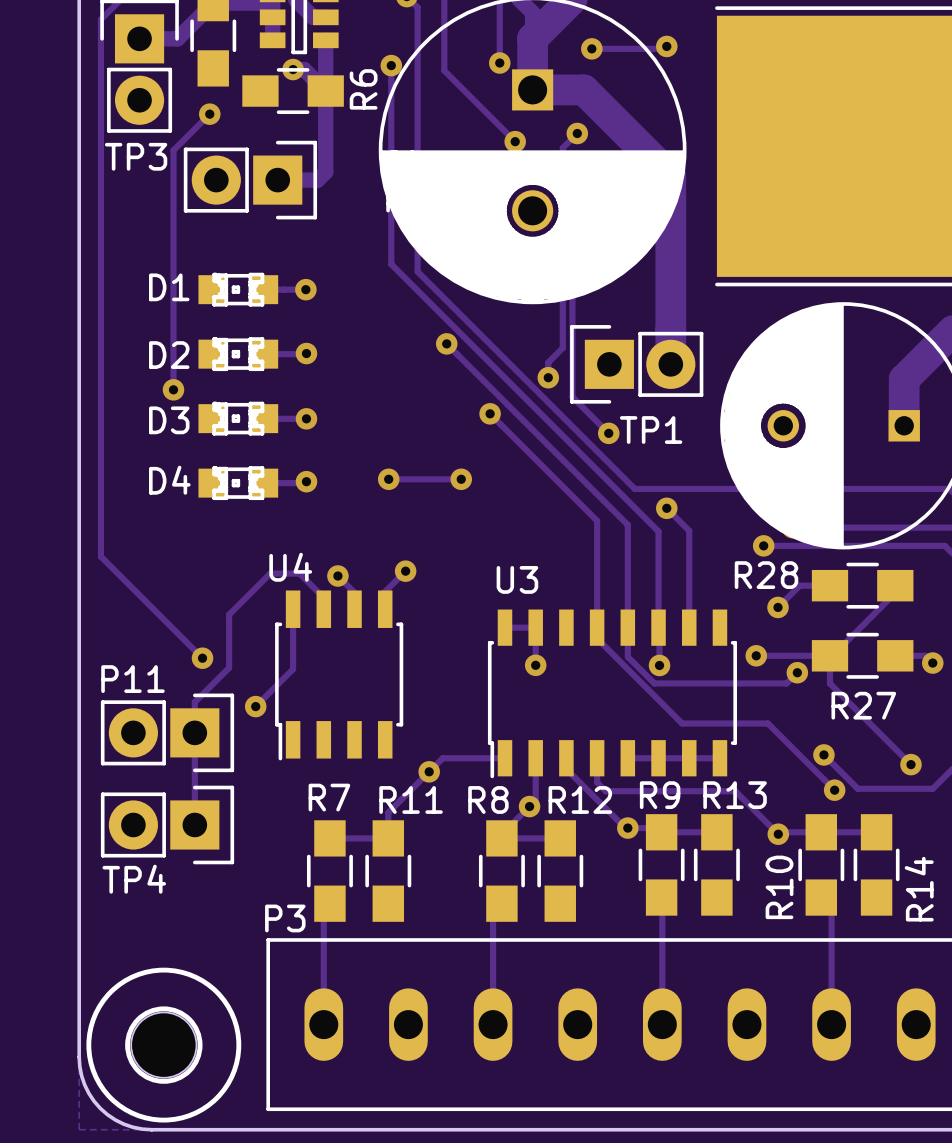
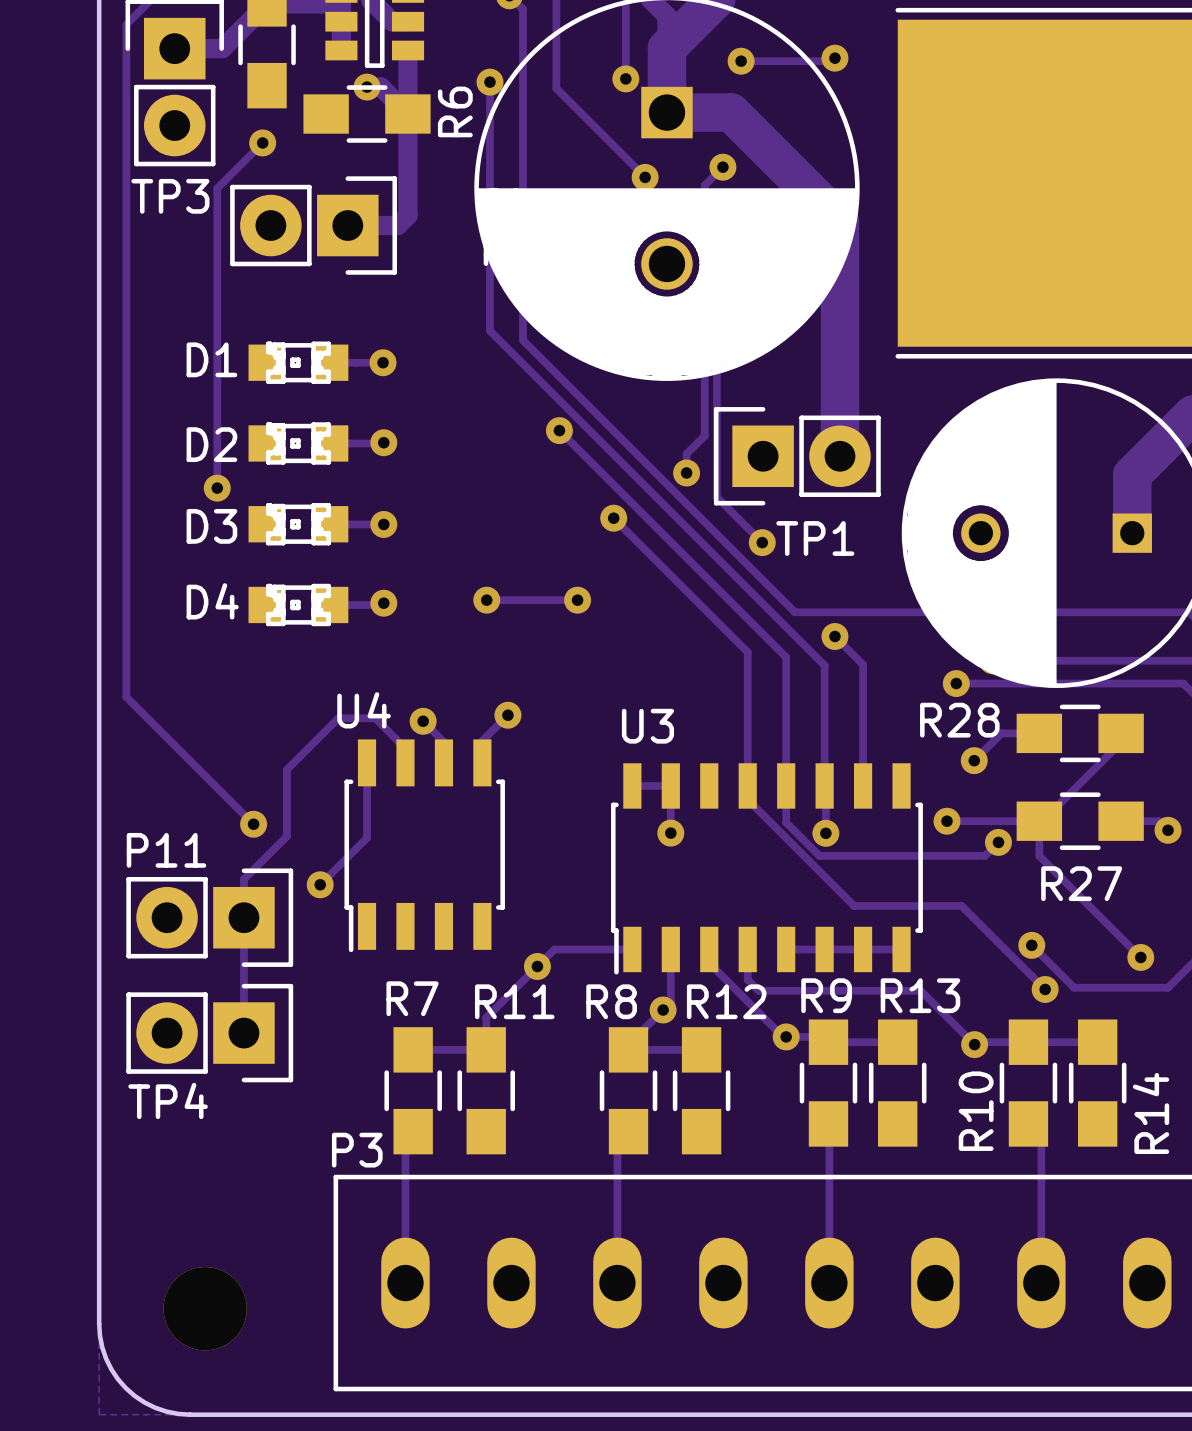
drawing: [86, 967, 242, 1123] -> none
part footprint: [131, 1012, 197, 1078] -> [163, 1267, 247, 1351]

